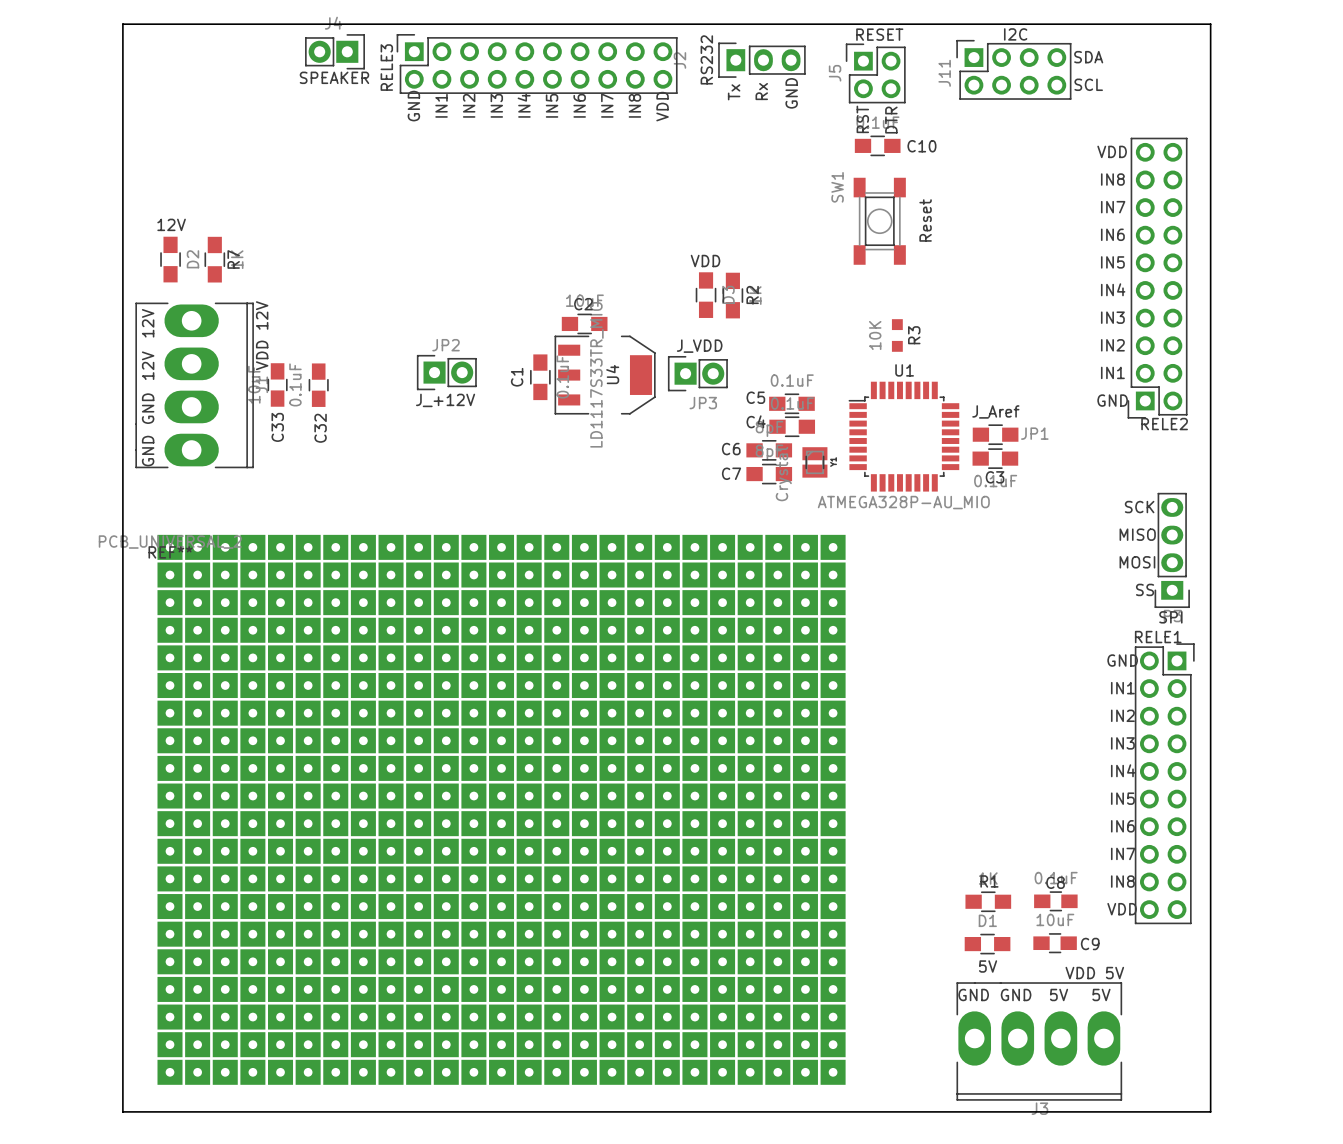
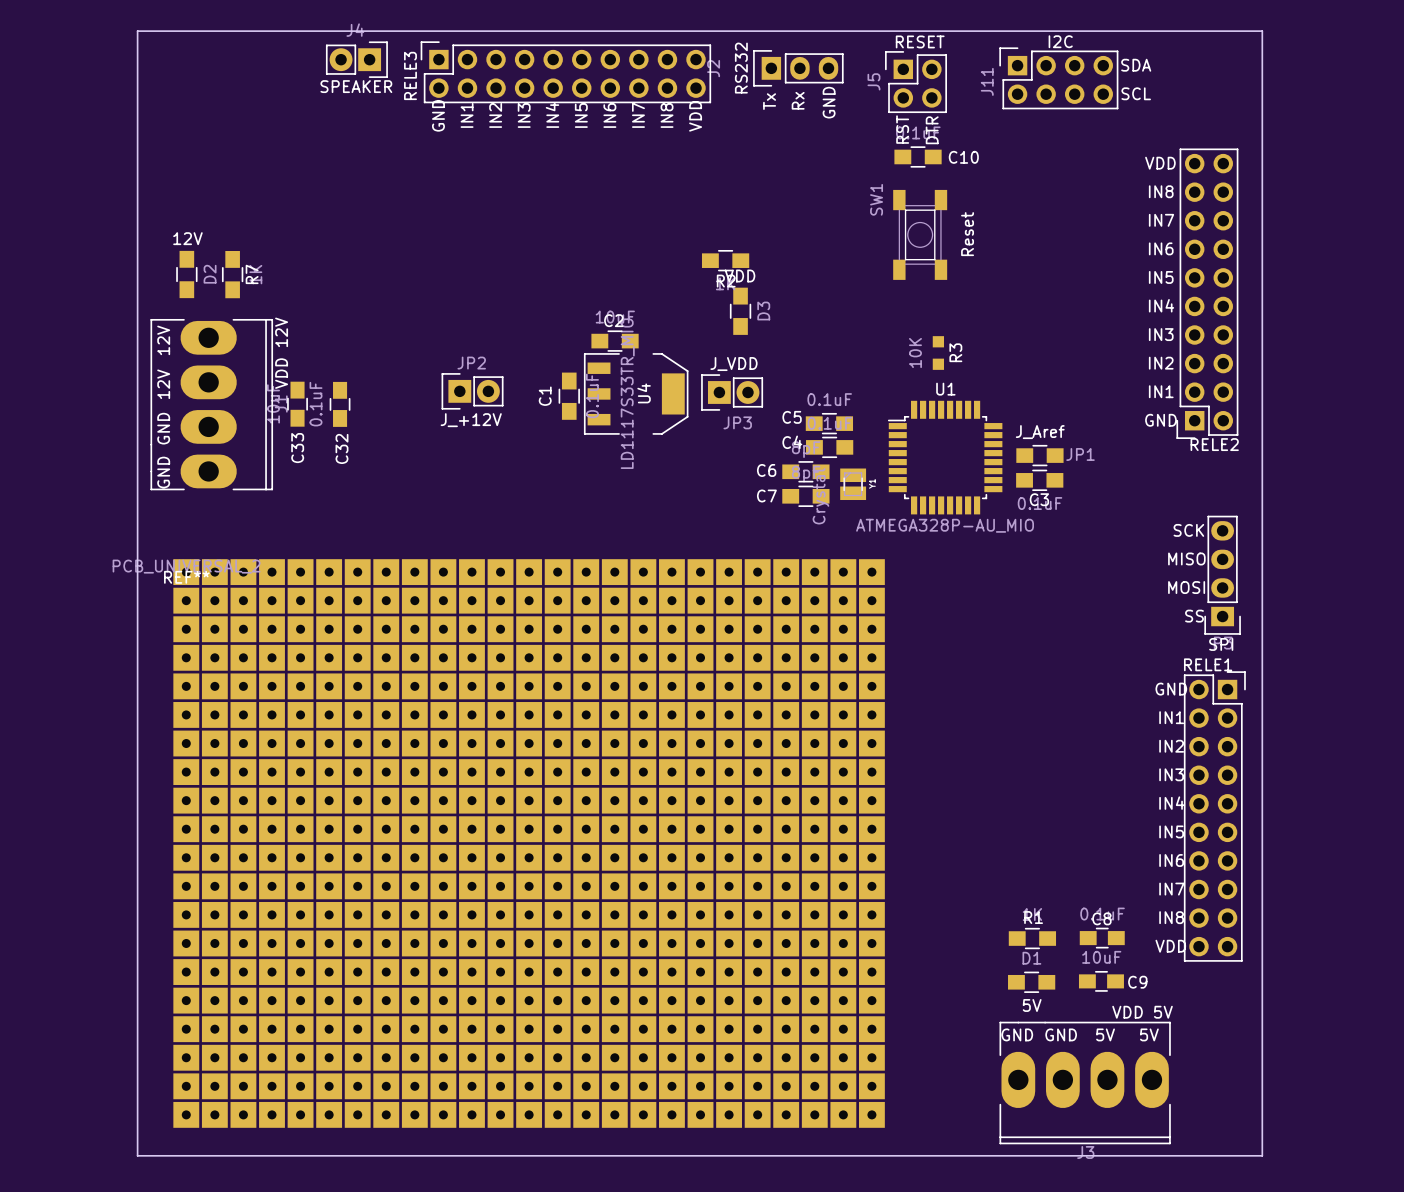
R2 rotation: 0° (732, 295) -> 90° clockwise (725, 260)
R2 position: (732, 295) -> (725, 260)

